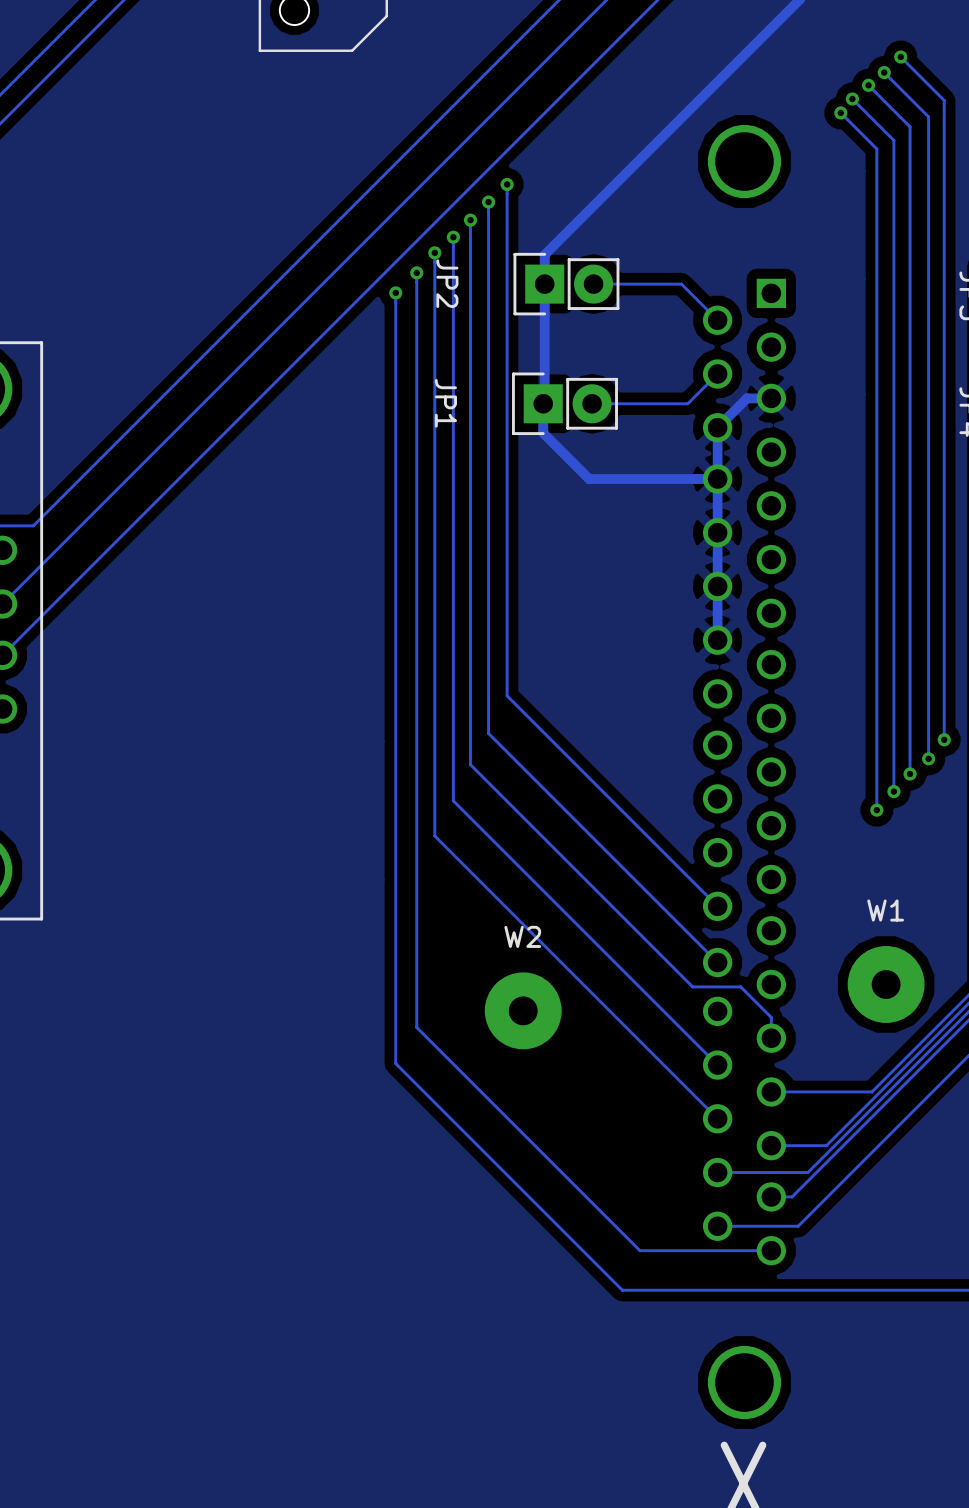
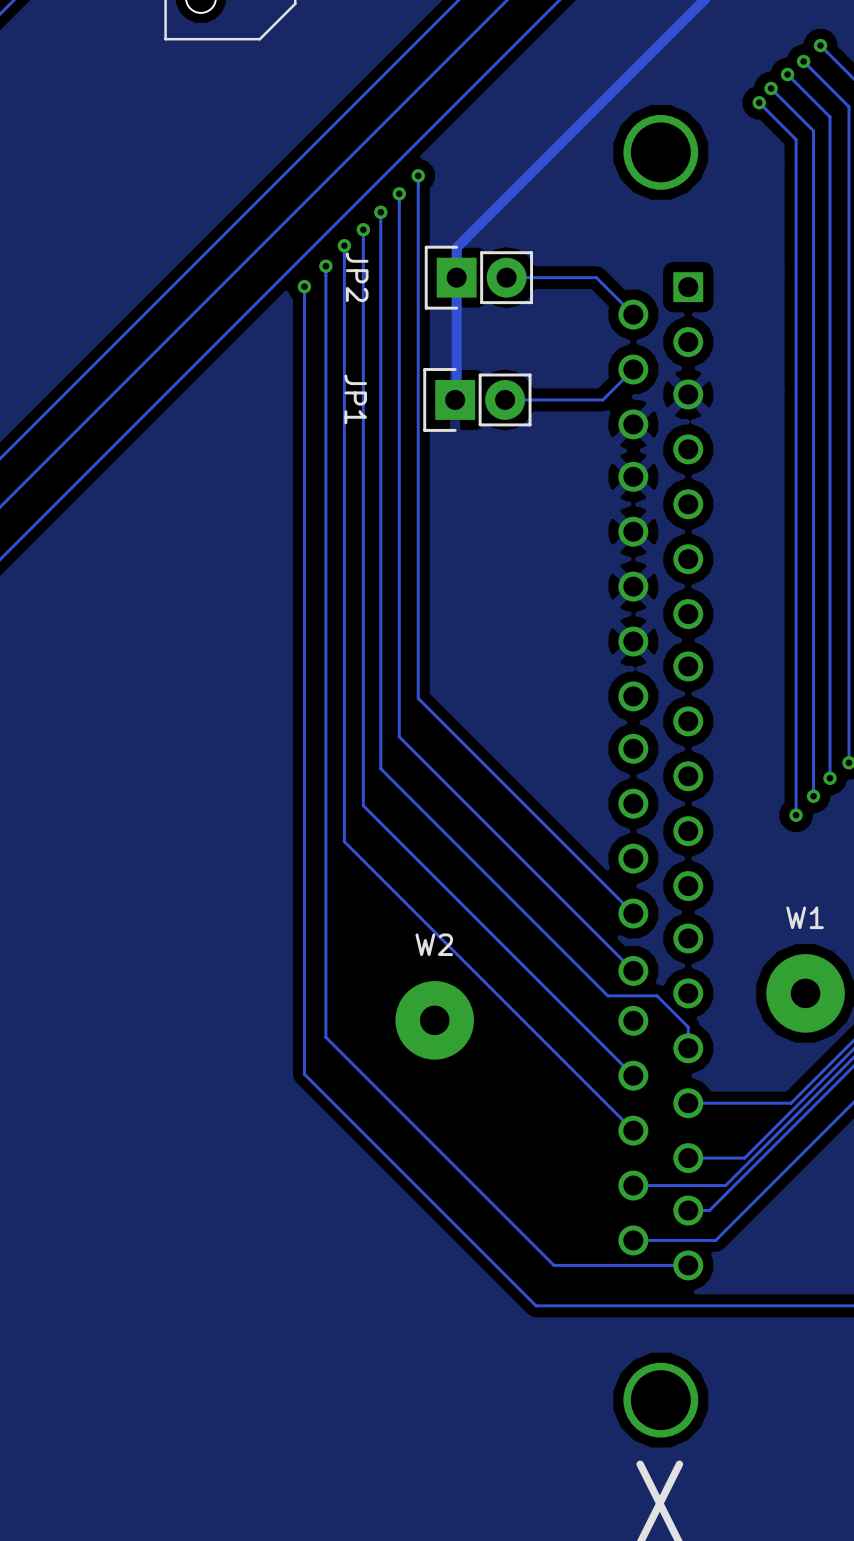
track: (771, 398) (746, 398) (717, 427) (717, 640) -> none
track: (543, 403) (543, 433) (589, 478) (717, 478) -> none

